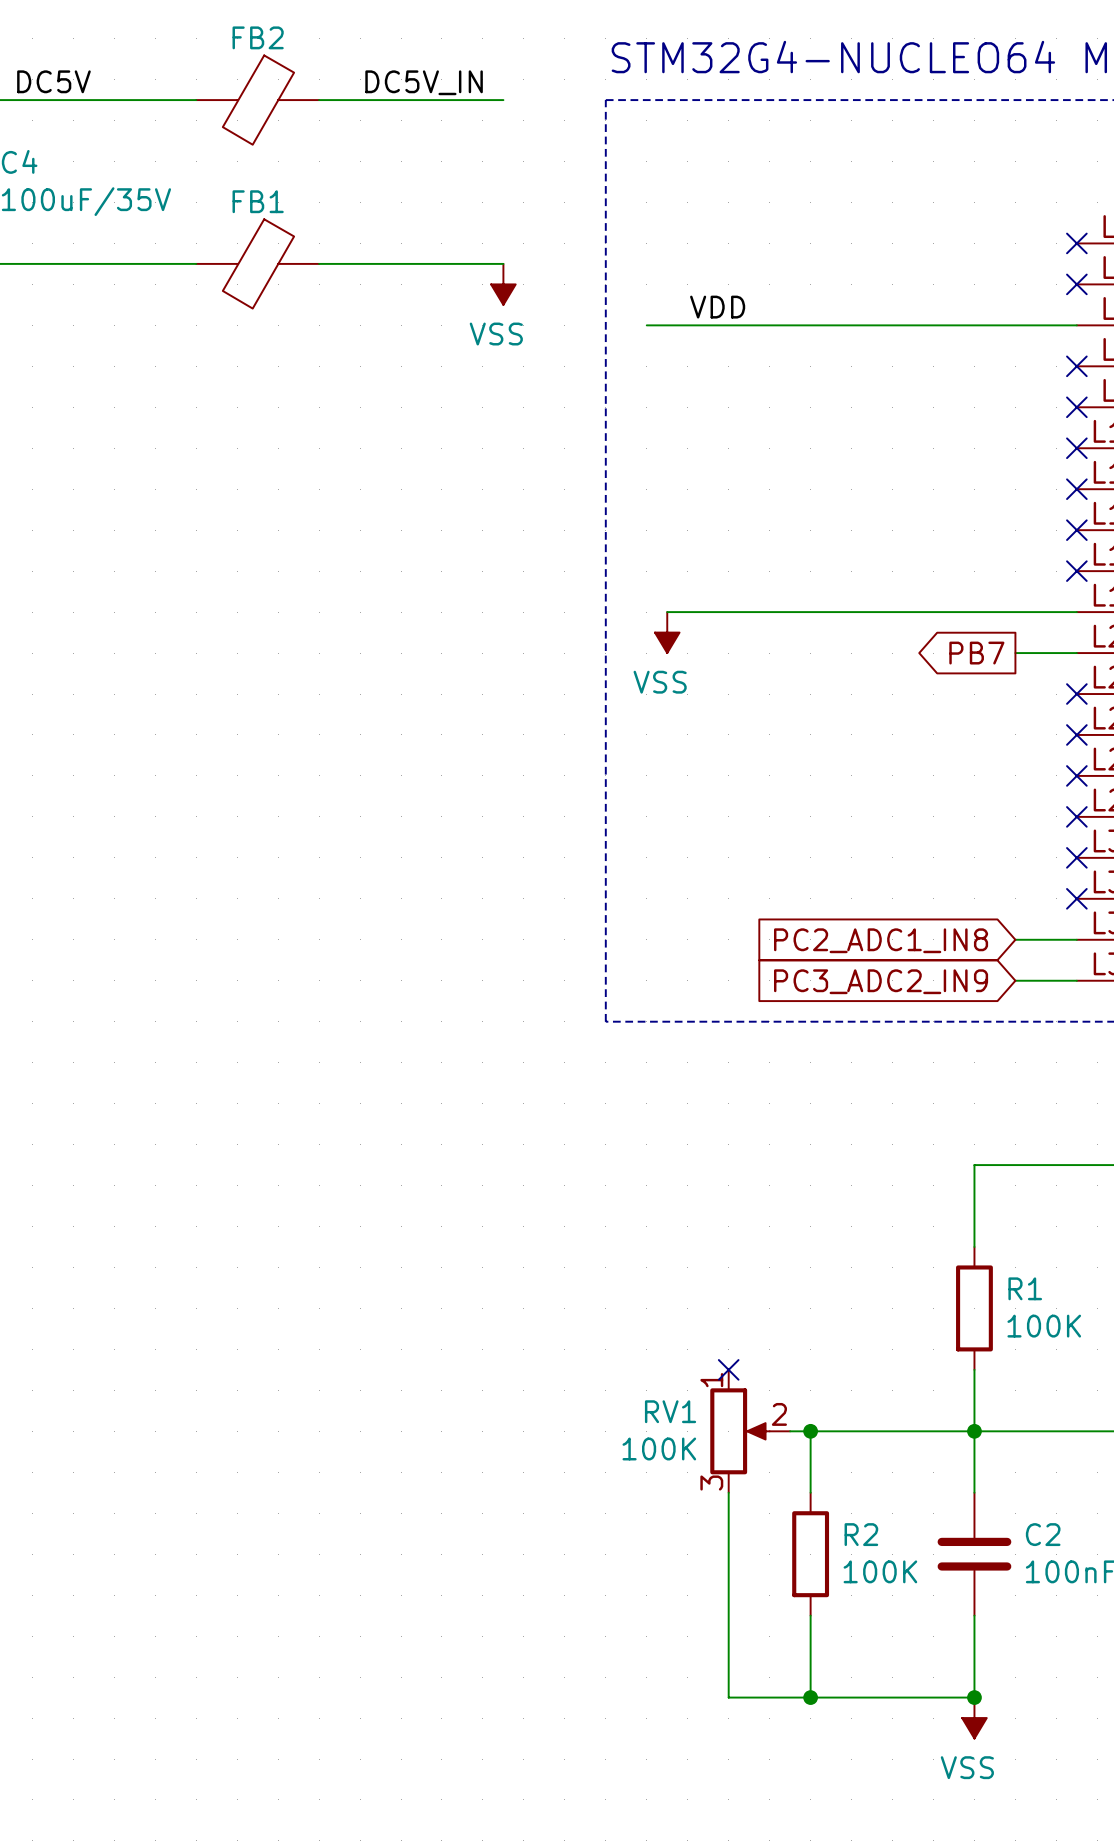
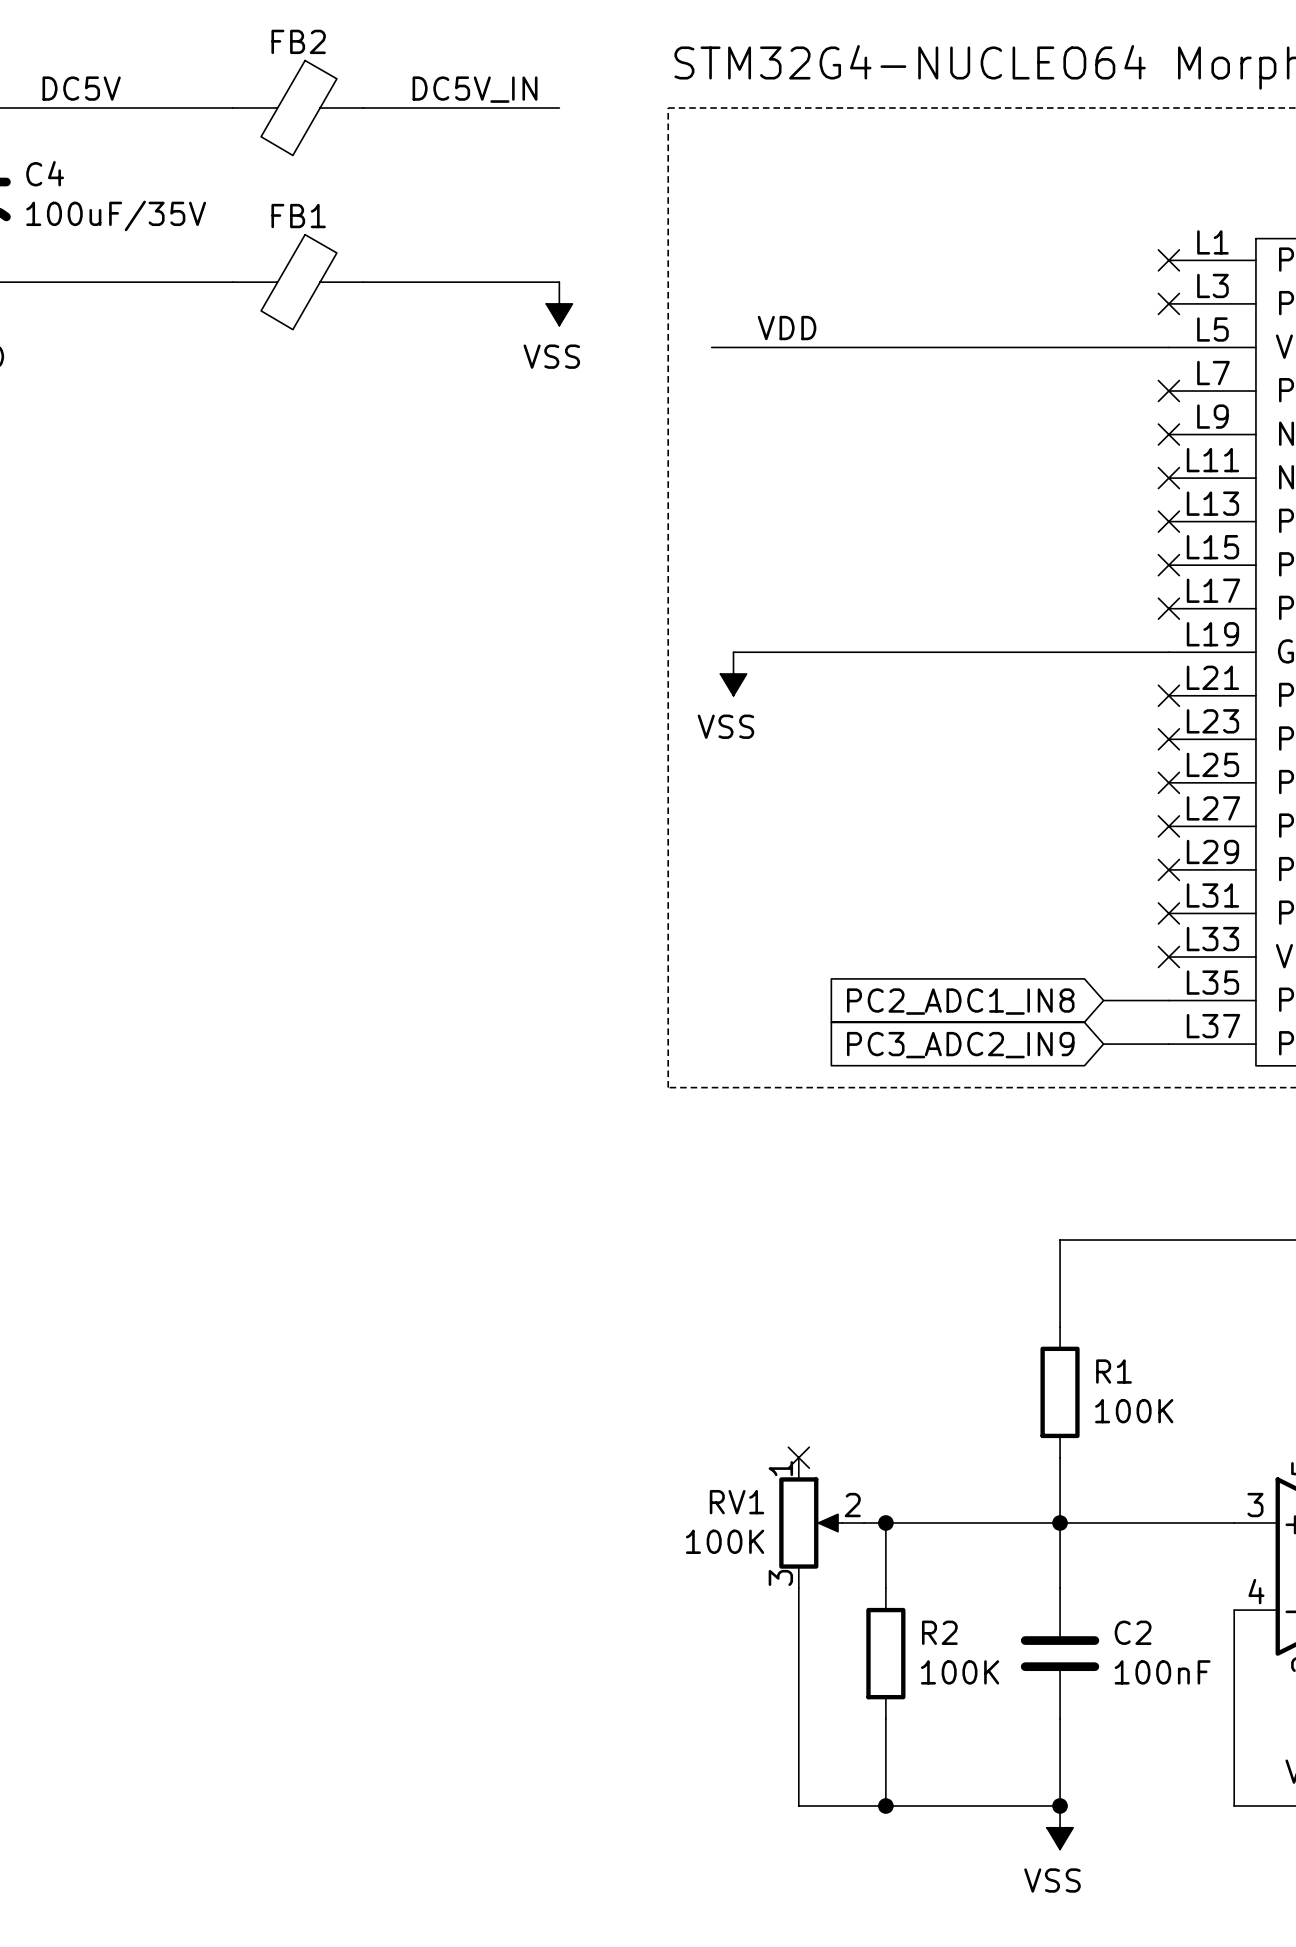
global label: PB7 (976, 653) -> none
wire: (1015, 653) (1076, 653) -> none
no-connect mark: none -> (1168, 695)

